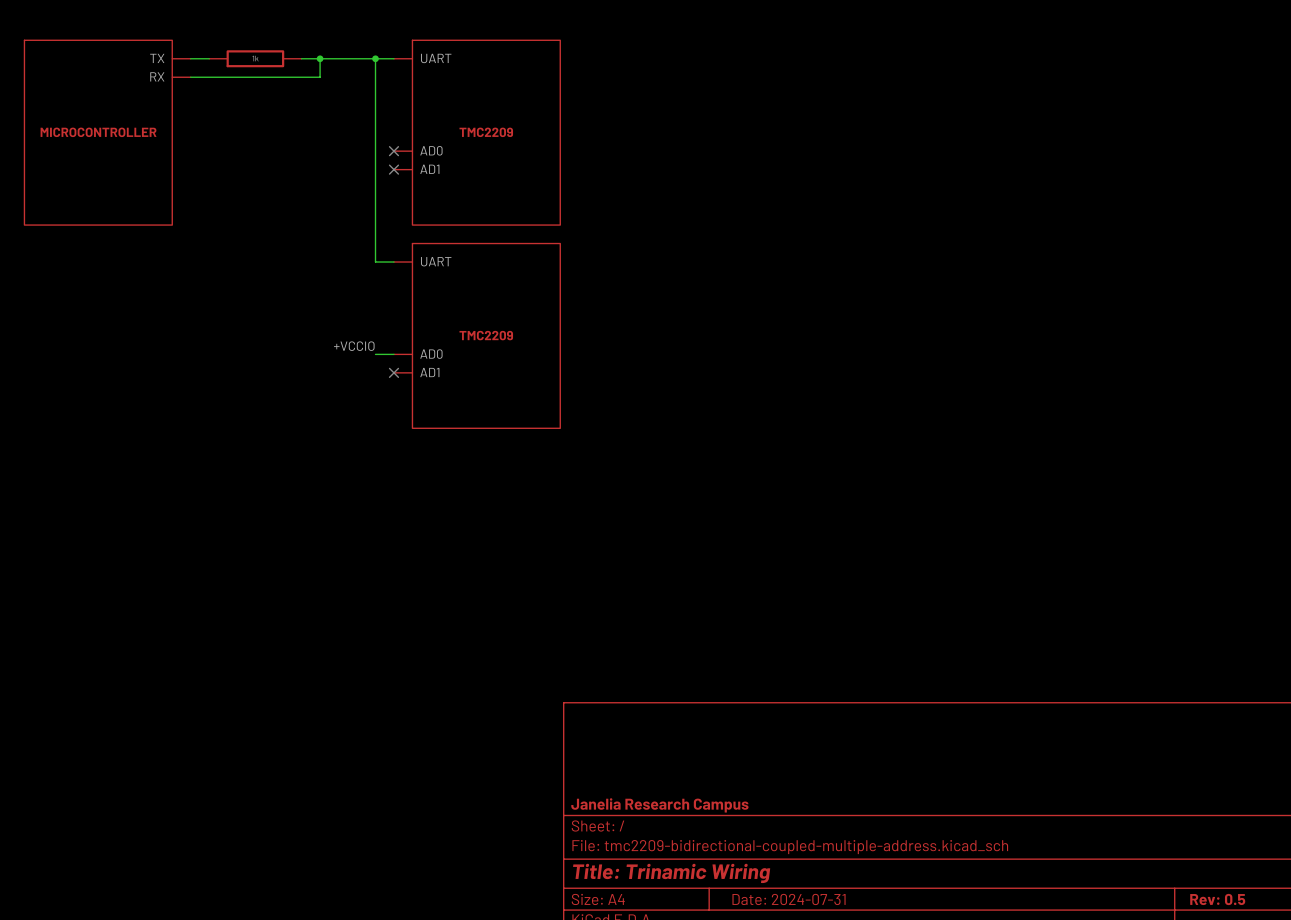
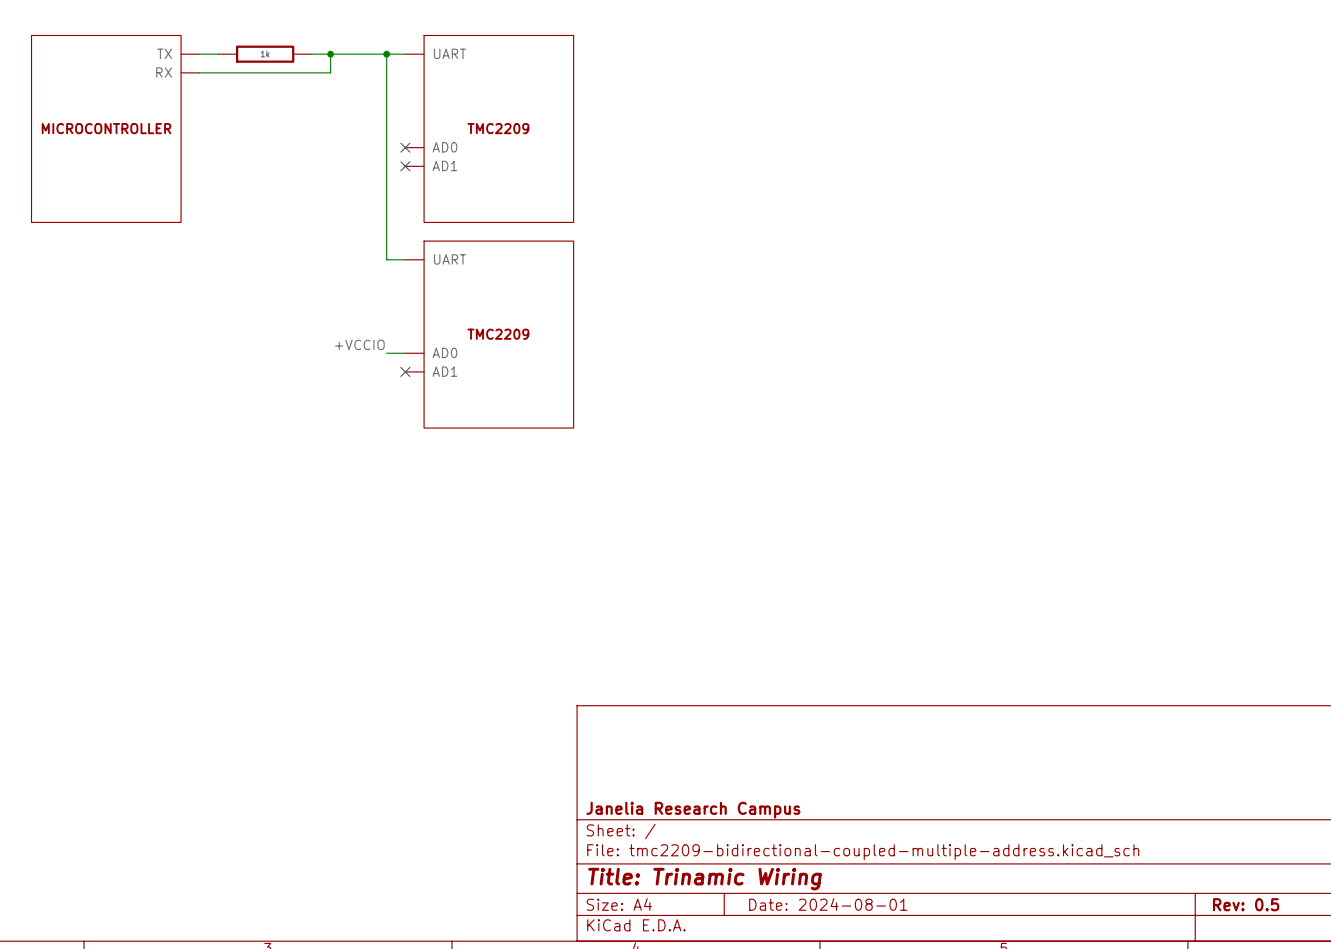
title block: Date: 2024-07-31 (789, 899) -> Date: 2024-08-01 (828, 904)

